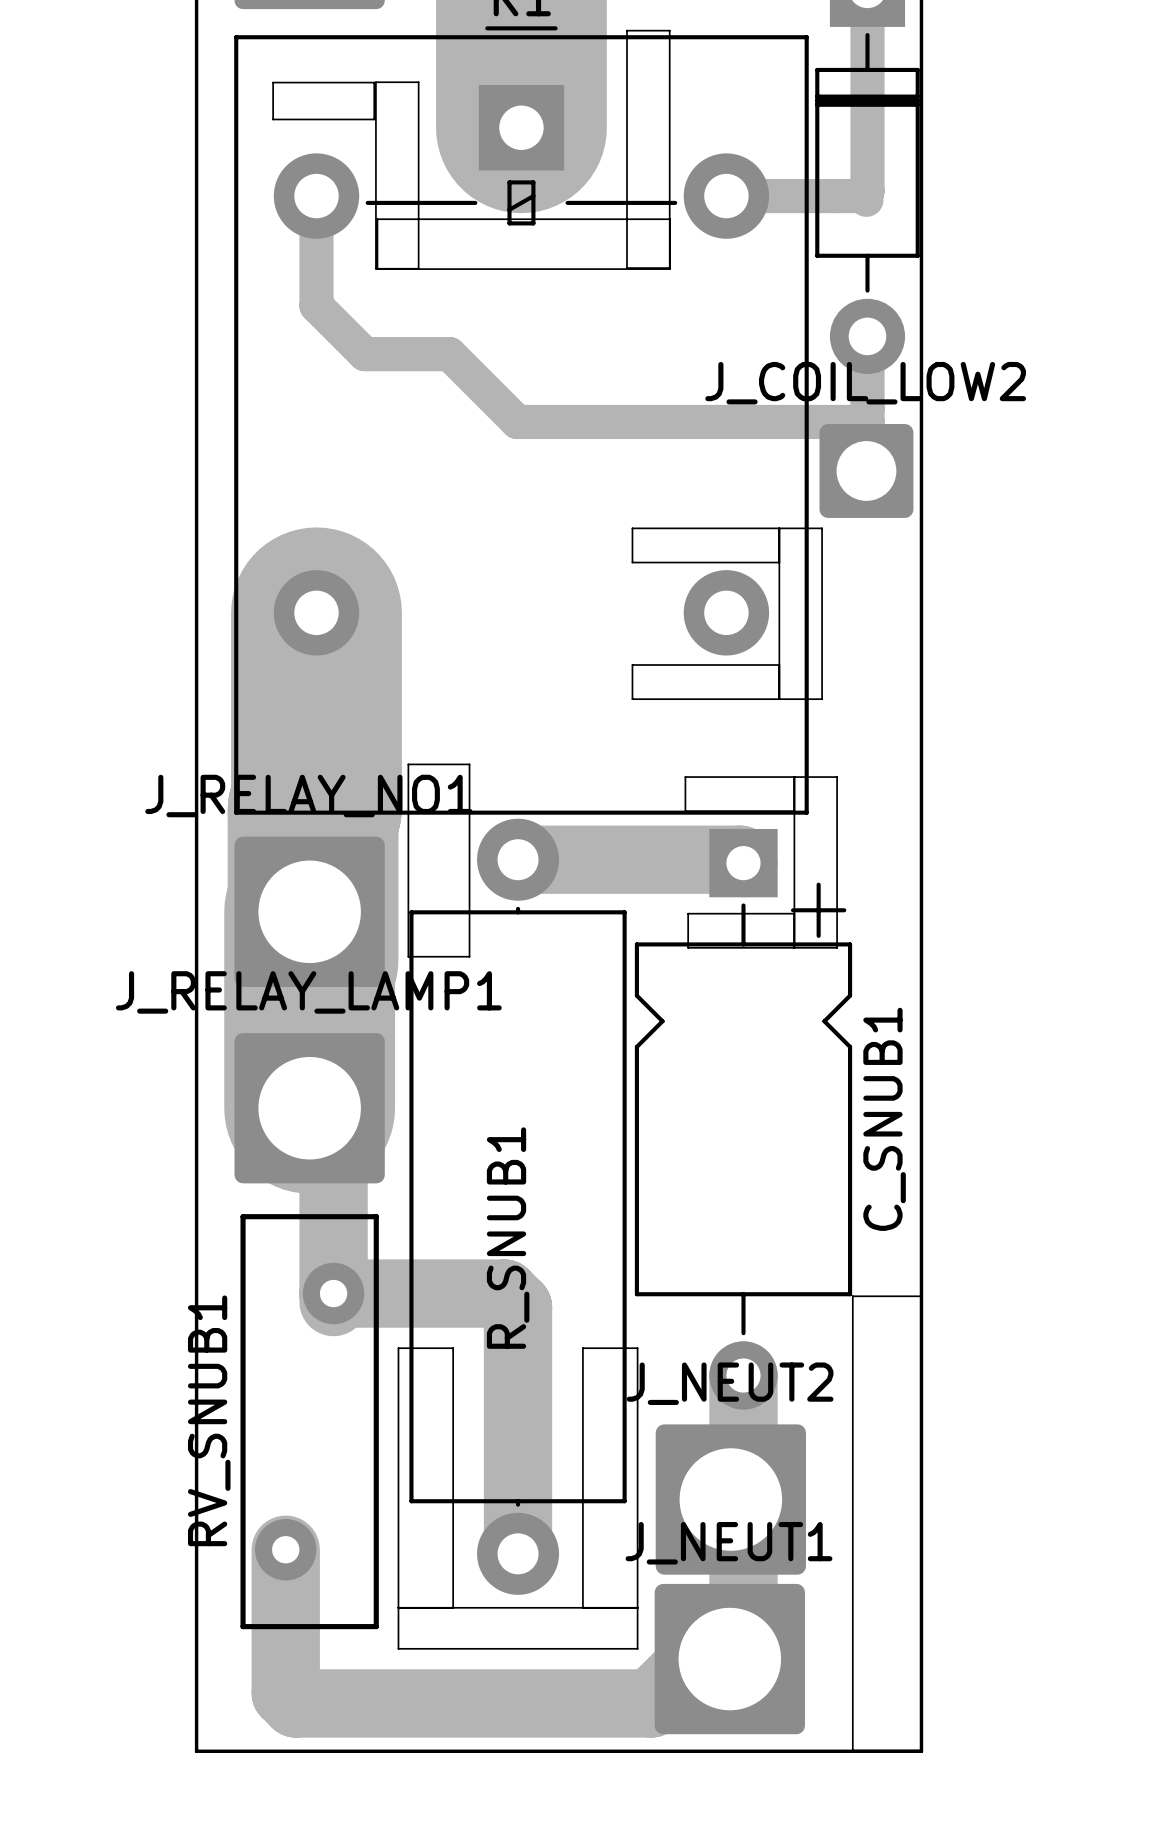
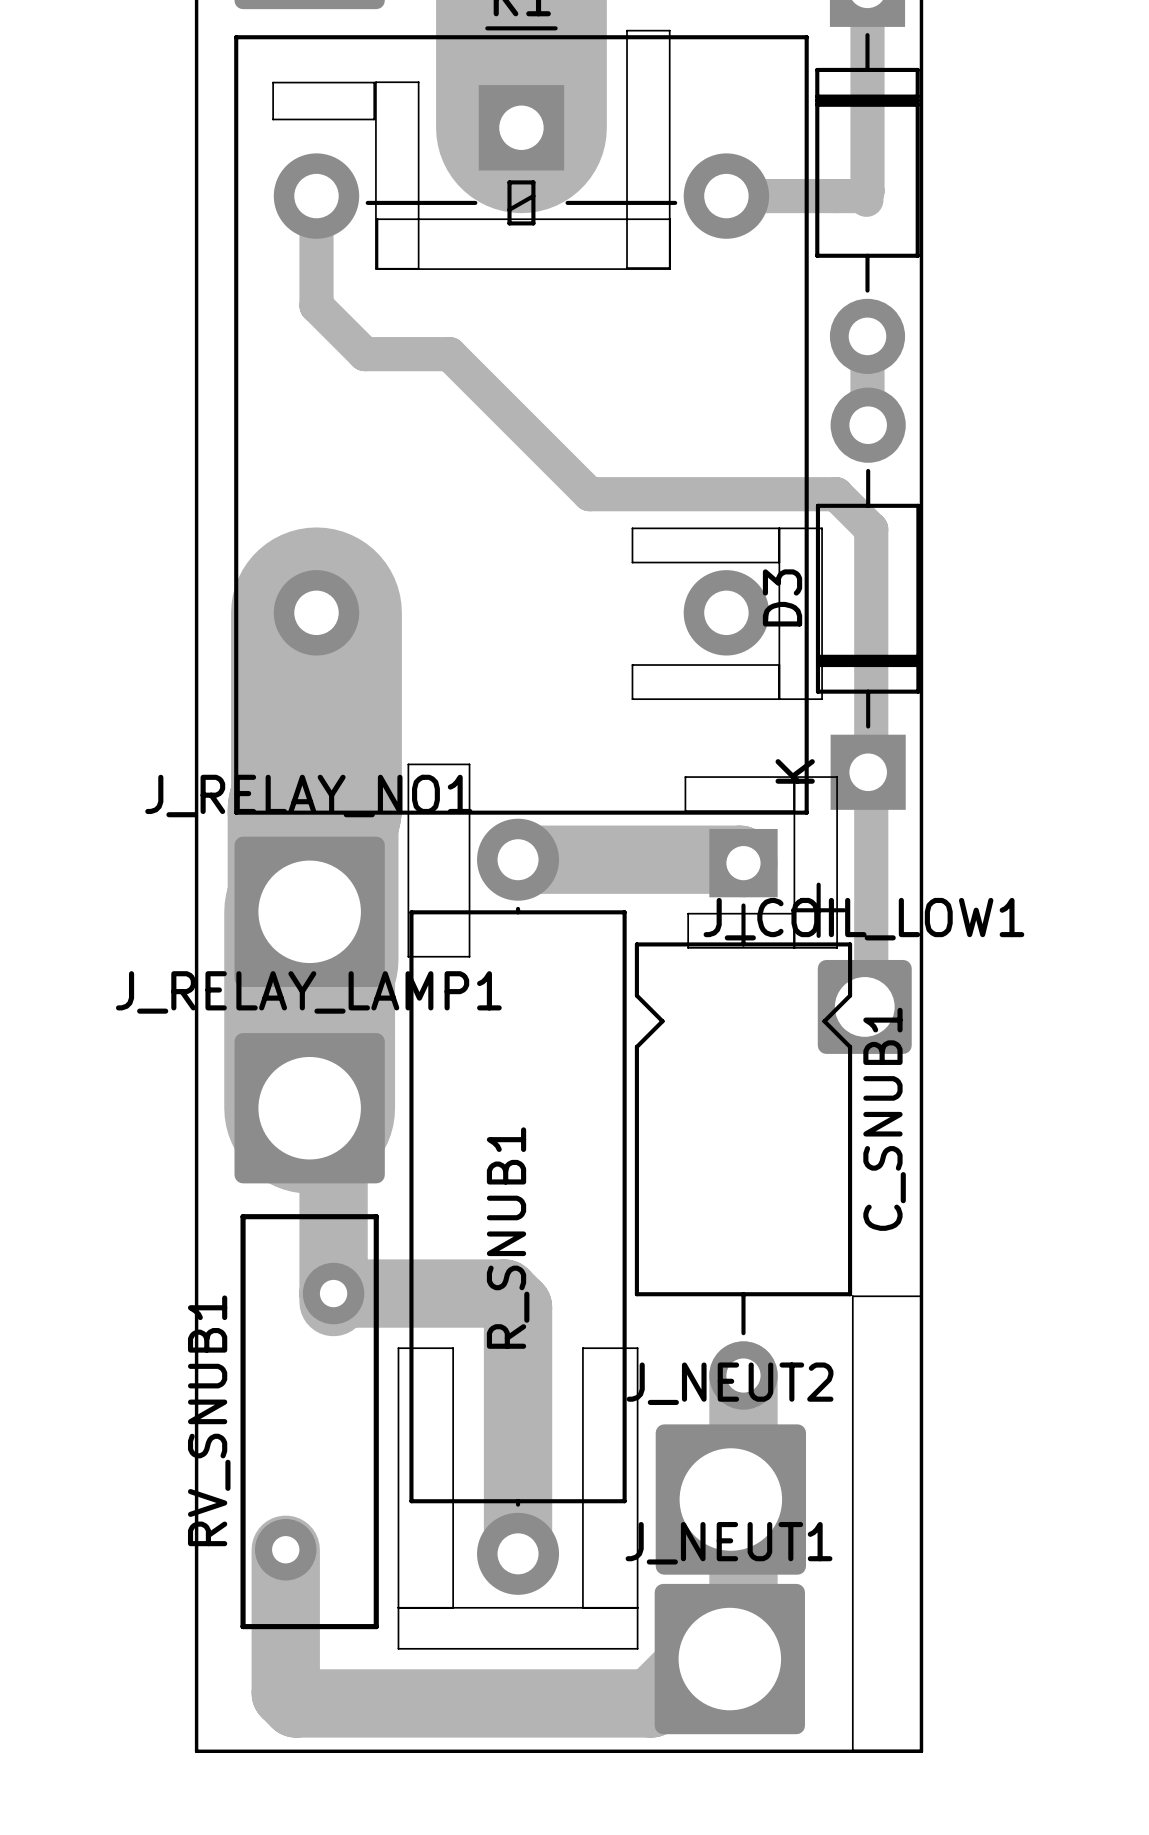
track: (517, 421) (867, 421) (866, 470) -> (517, 421) (589, 494) (836, 494) (871, 529) (871, 1000) (864, 1006)
J_COIL_LOW2: (866, 470) -> none
D3: none -> (868, 598)
J_COIL_LOW1: none -> (864, 1006)

